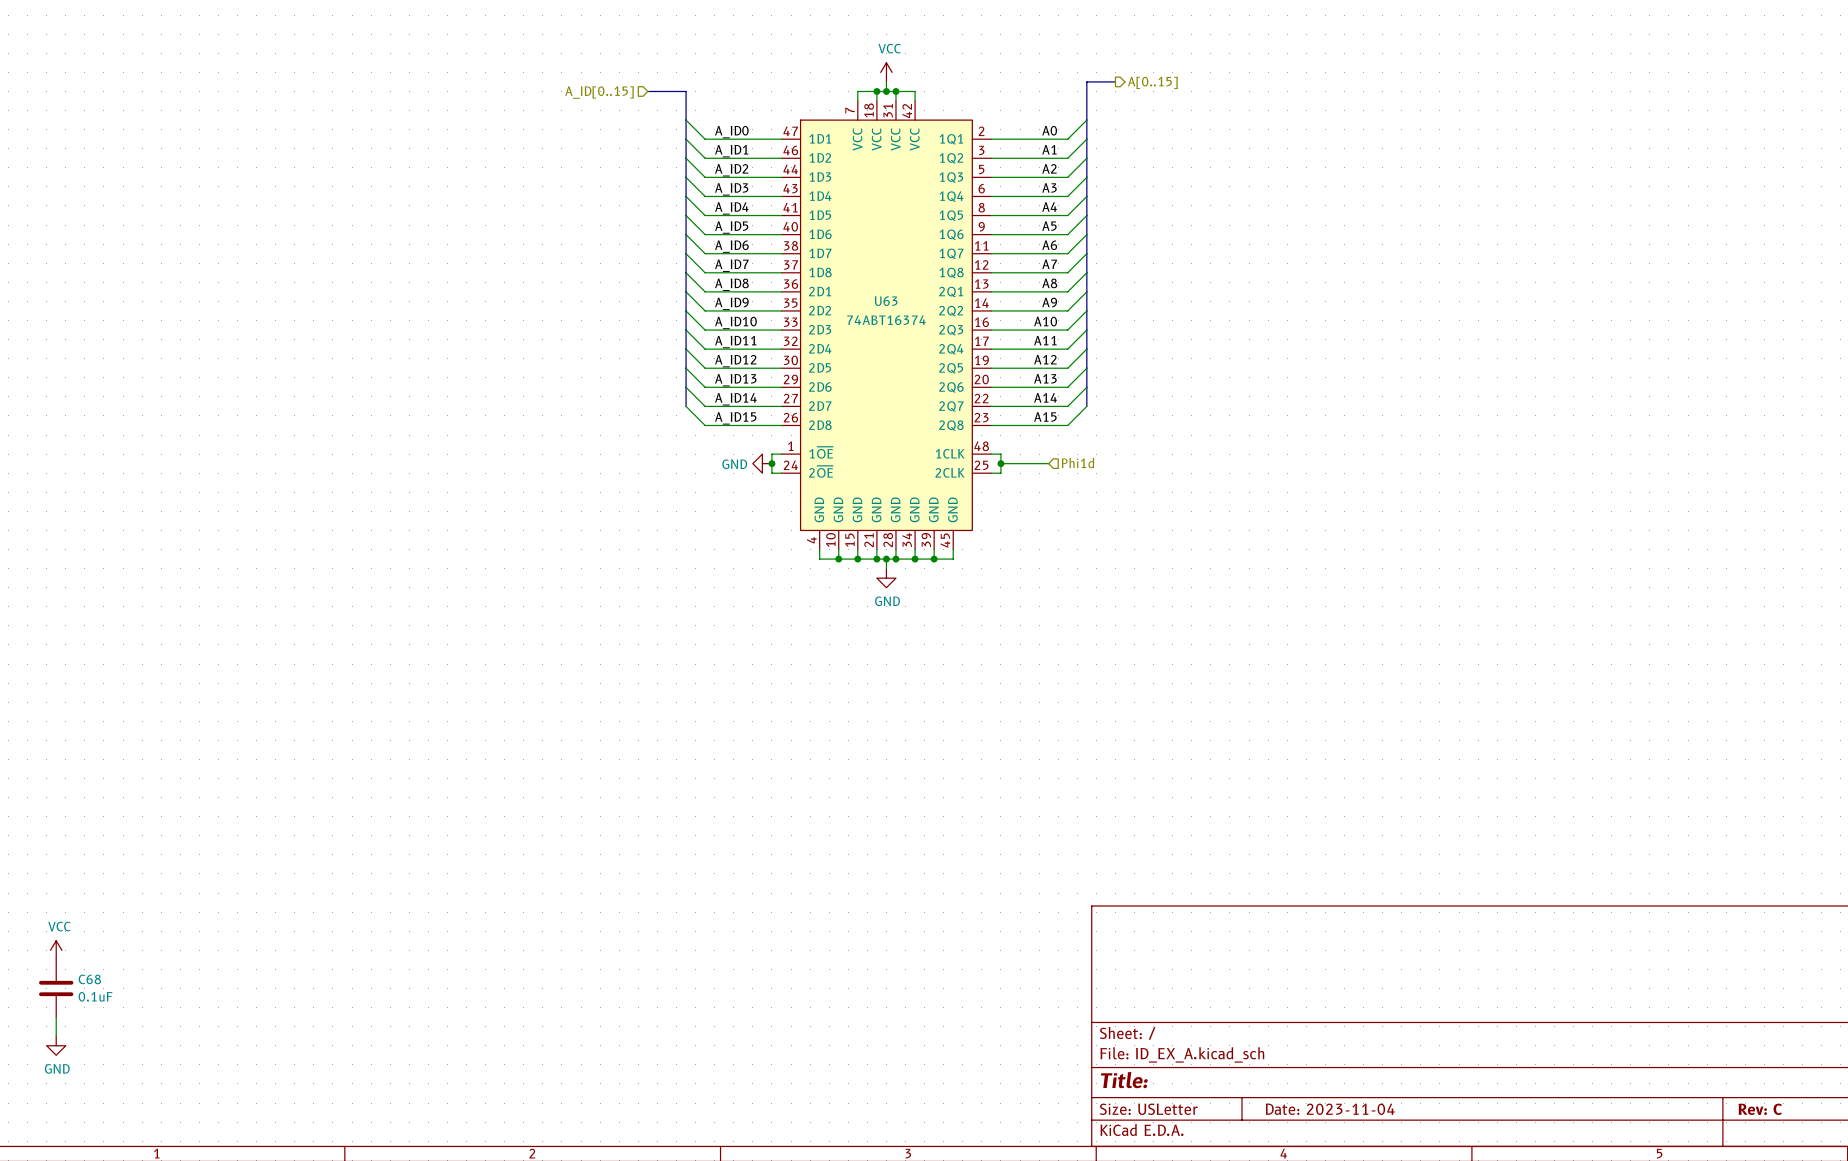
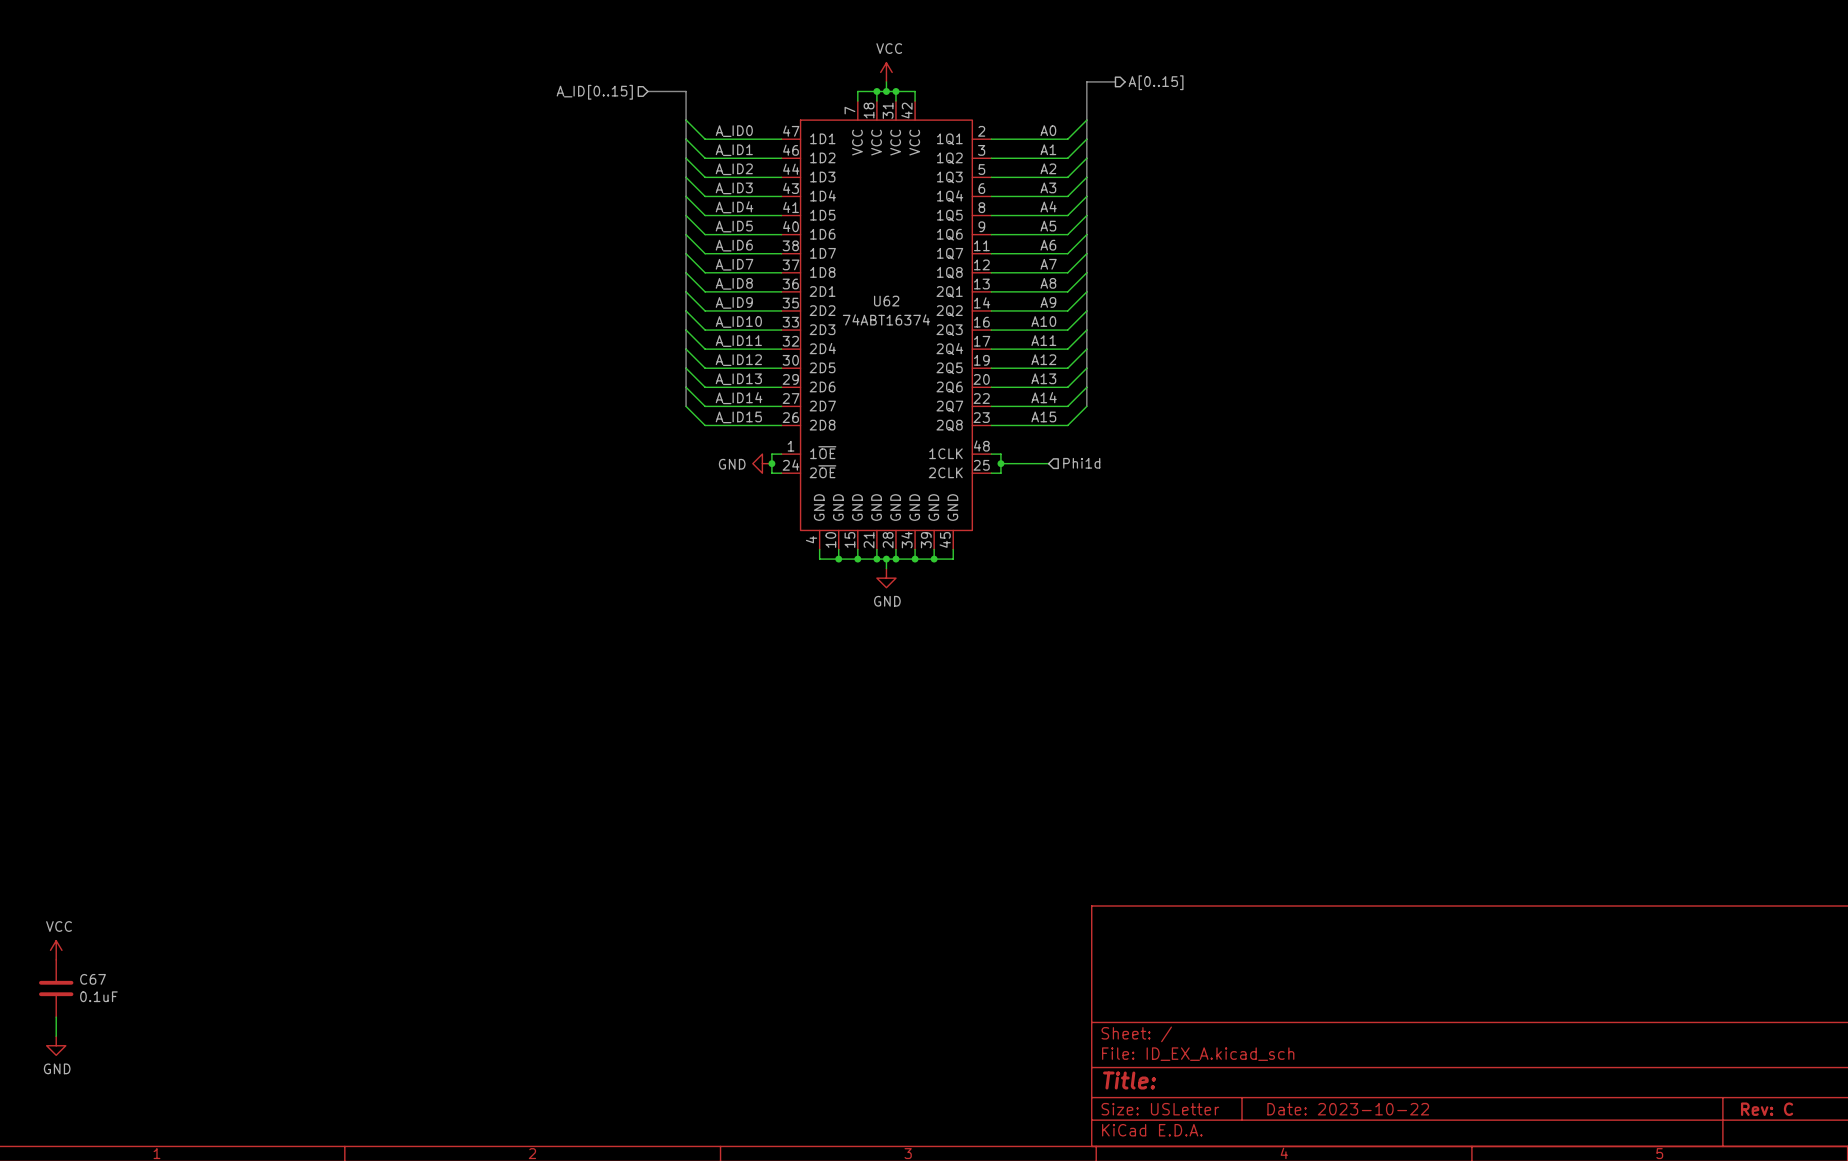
U63 name: U63 (886, 301) -> U62 (886, 301)
C68 name: C68 (89, 979) -> C67 (93, 979)
title block: Date: 2023-11-04 (1330, 1109) -> Date: 2023-10-22 (1348, 1109)

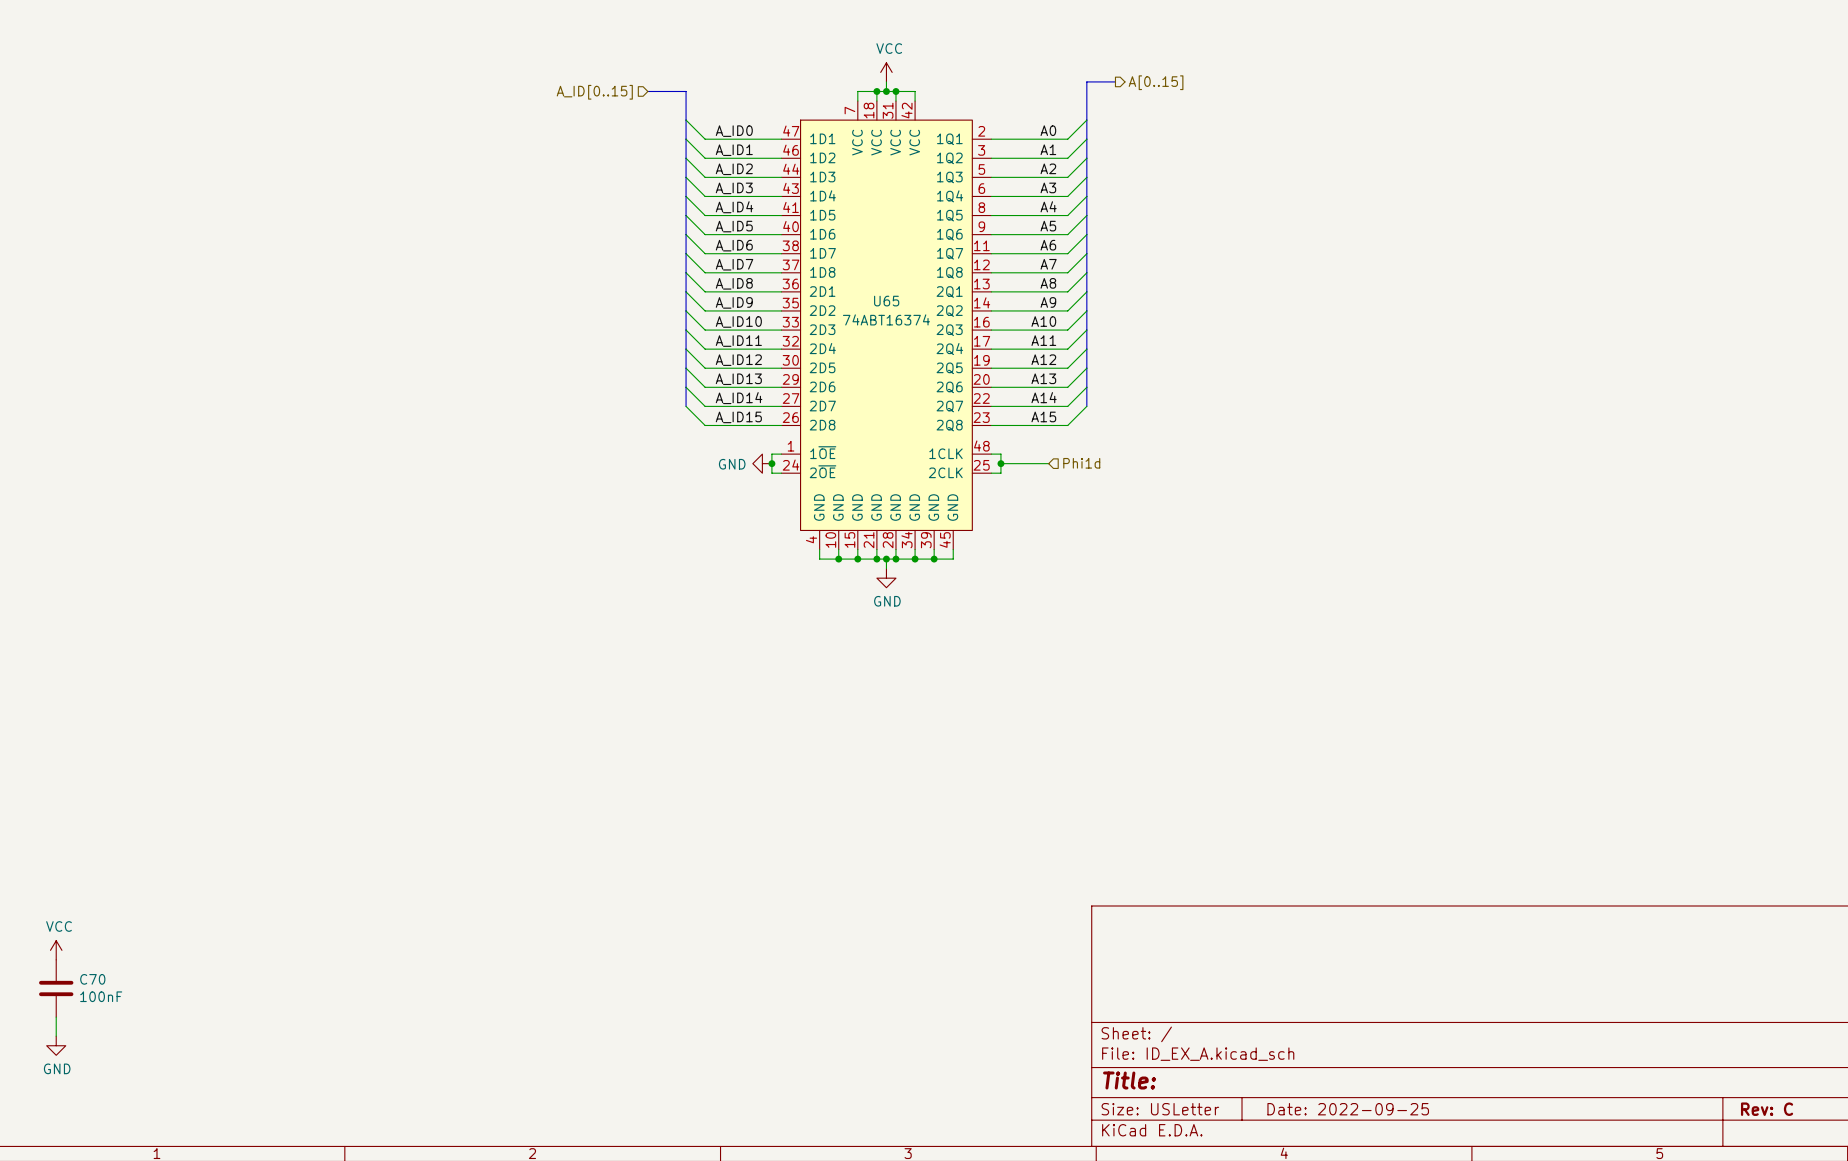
U62 name: U62 (886, 301) -> U65 (886, 301)
C67 name: C67 (93, 979) -> C70 (92, 979)
C67 value: 0.1uF (98, 996) -> 100nF (101, 996)
title block: Date: 2023-10-22 (1348, 1109) -> Date: 2022-09-25 (1348, 1109)

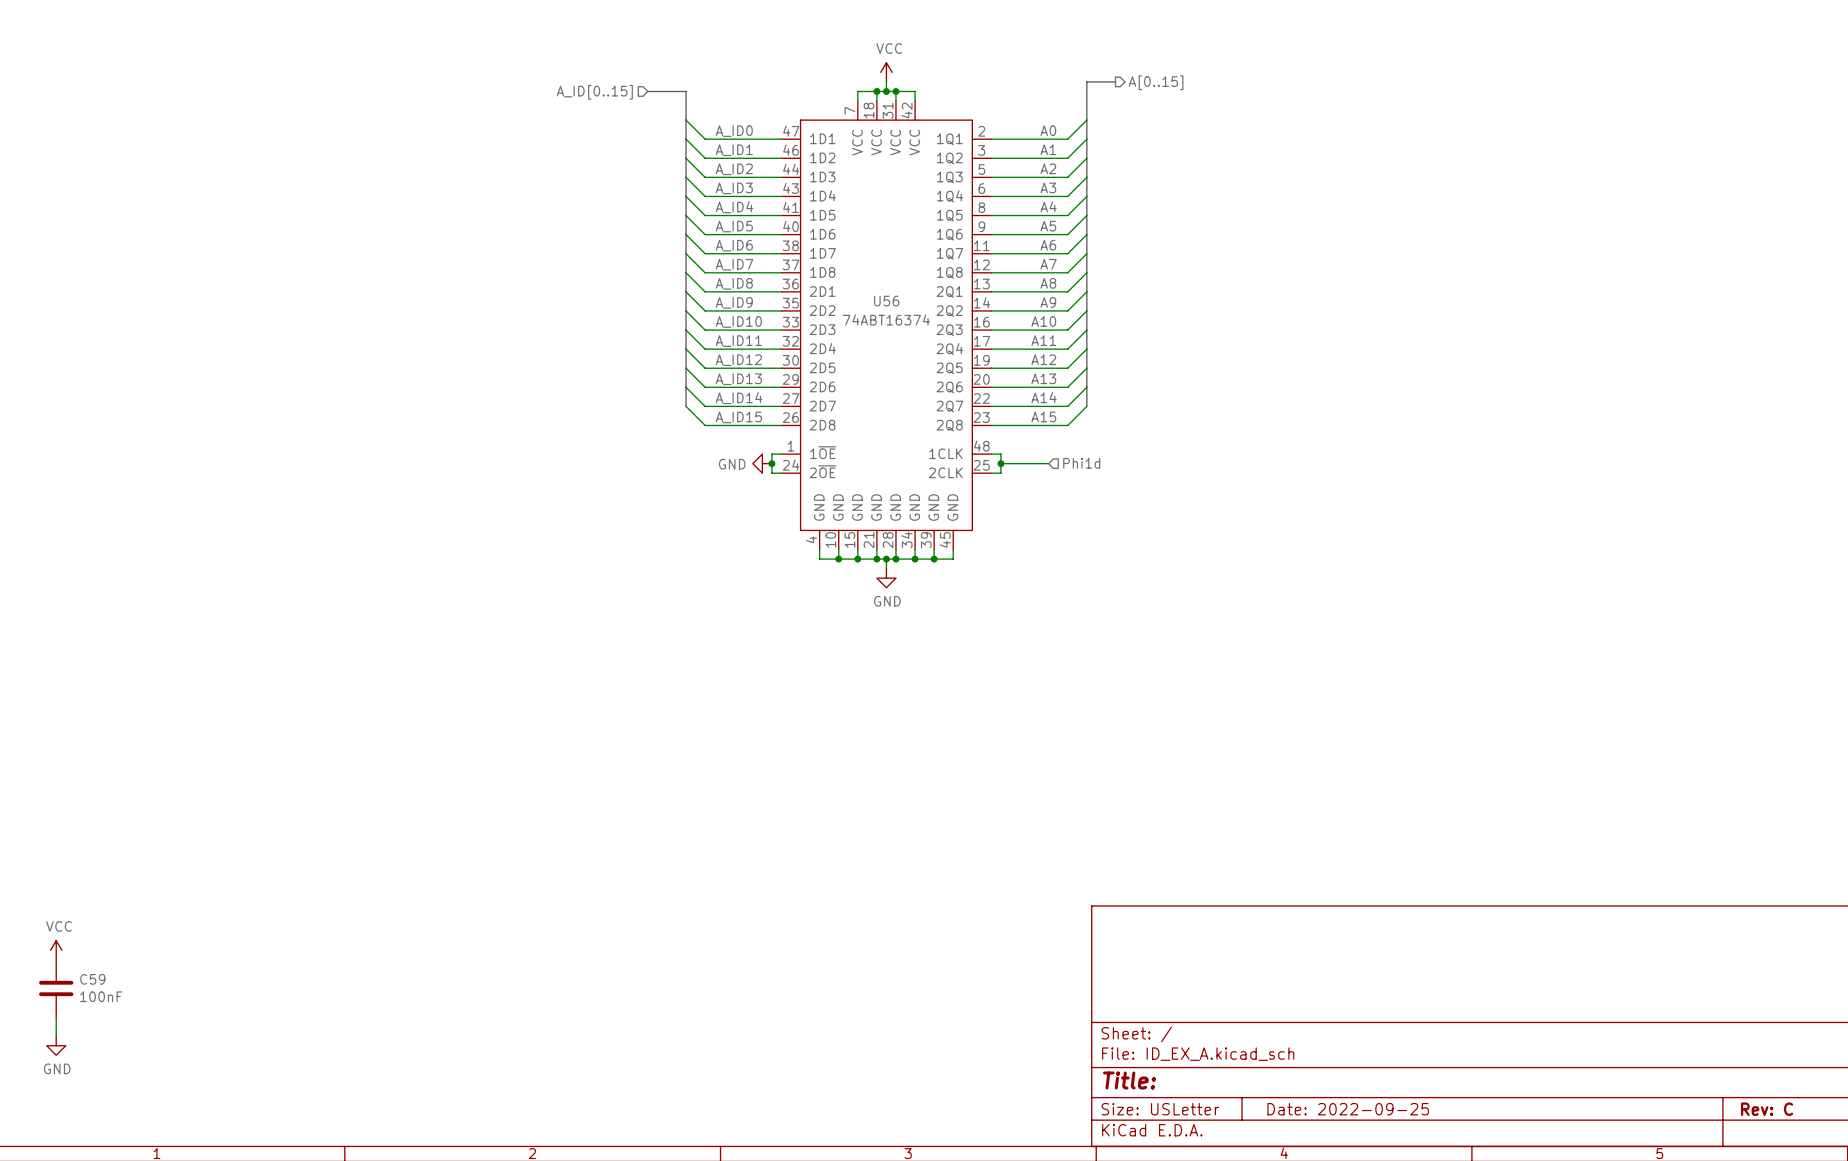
U65 name: U65 (886, 301) -> U56 (886, 301)
C70 name: C70 (92, 979) -> C59 (92, 979)

